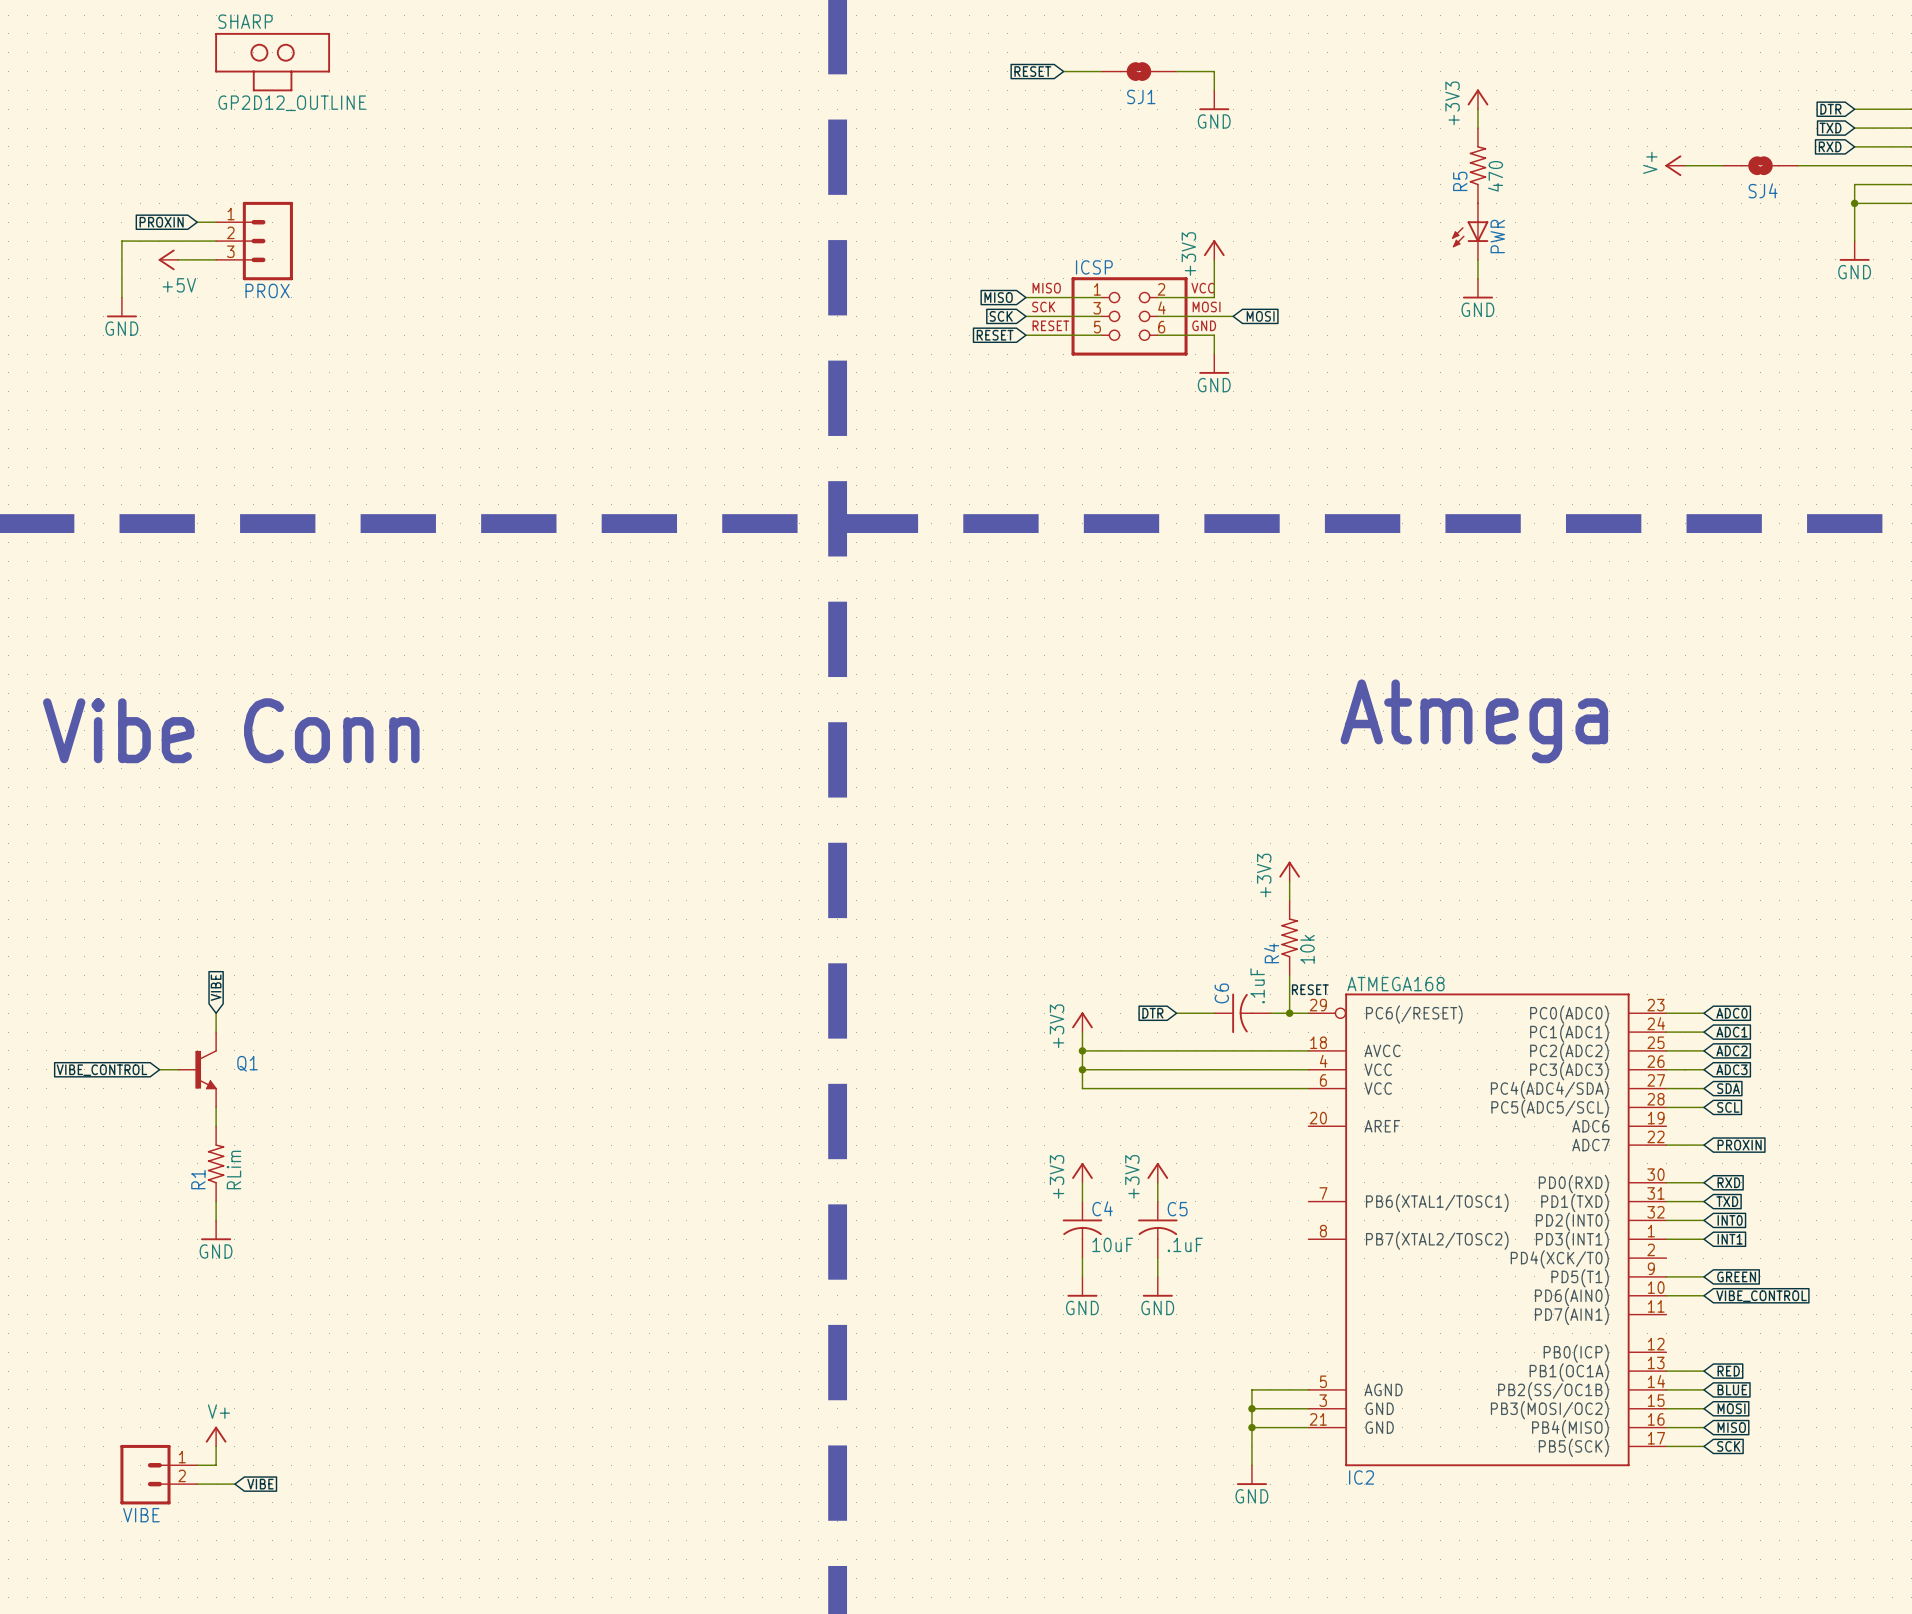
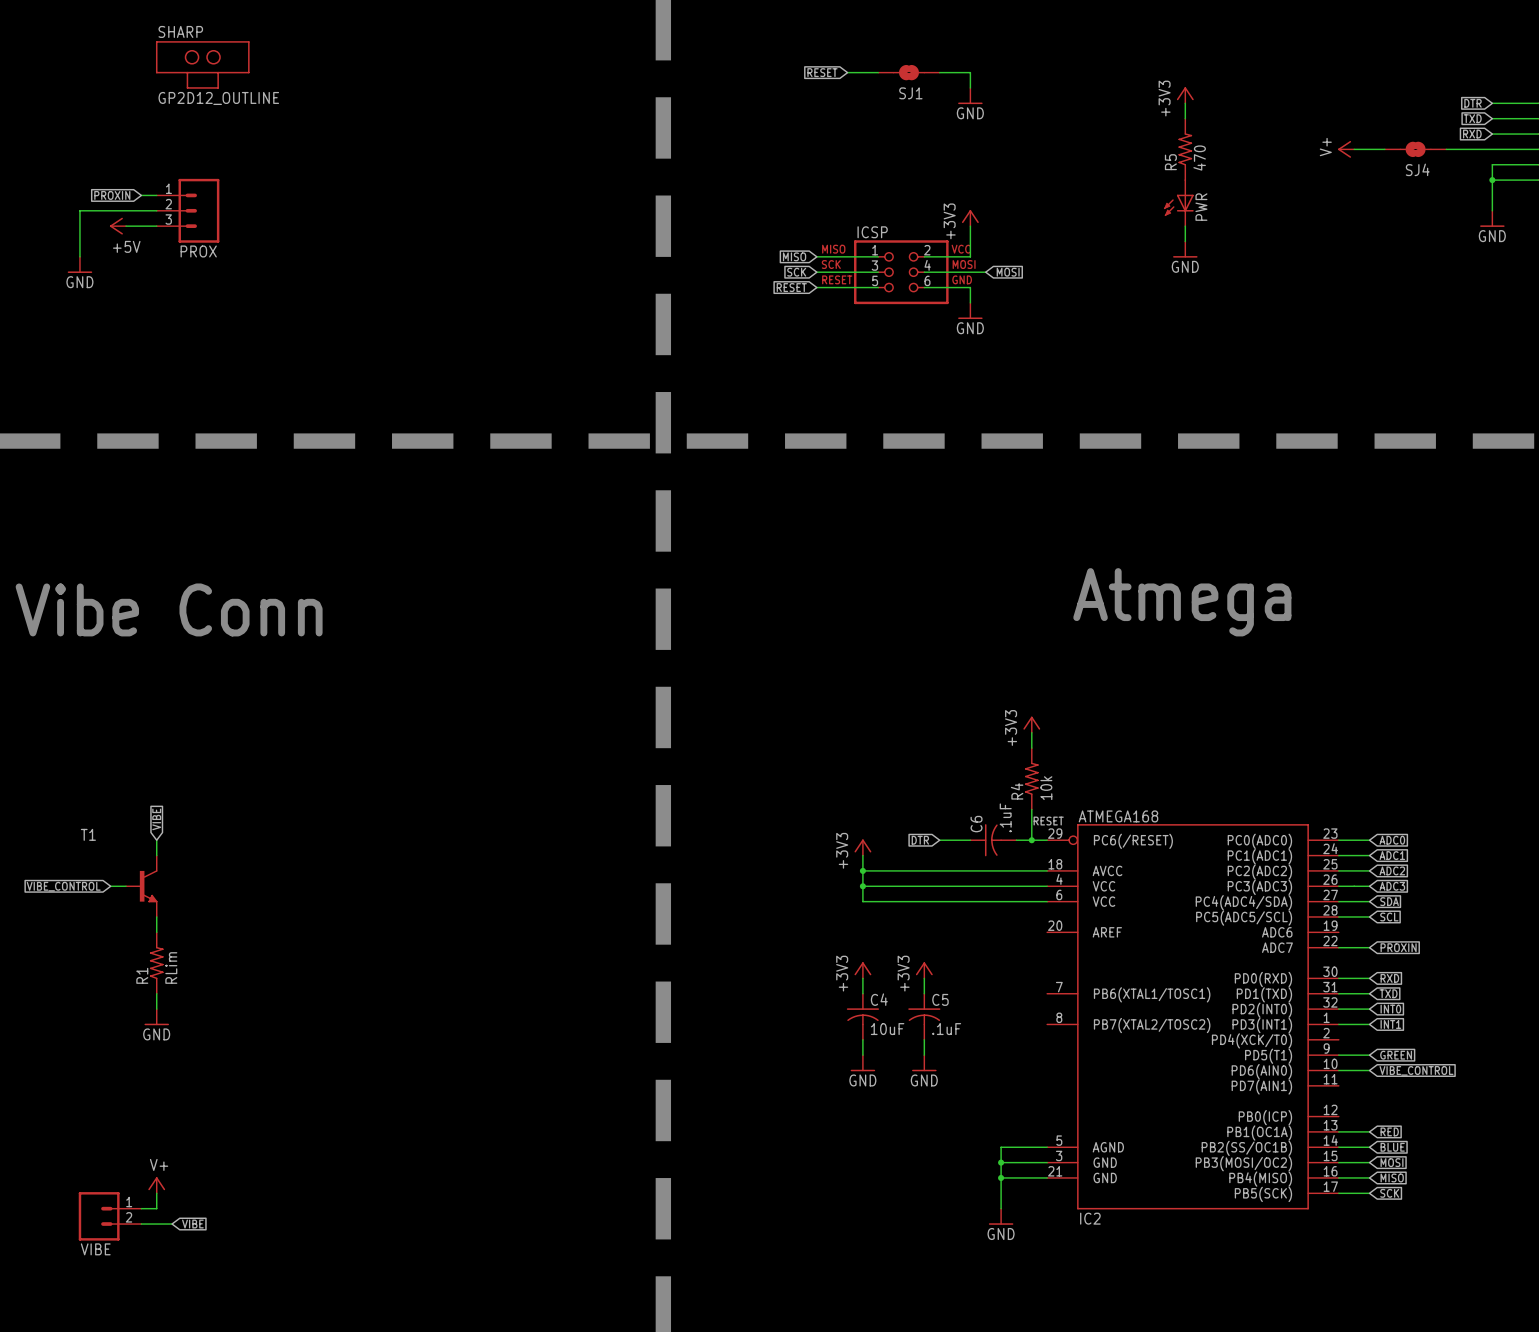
Q1 name: Q1 (247, 1063) -> T1 (88, 834)

